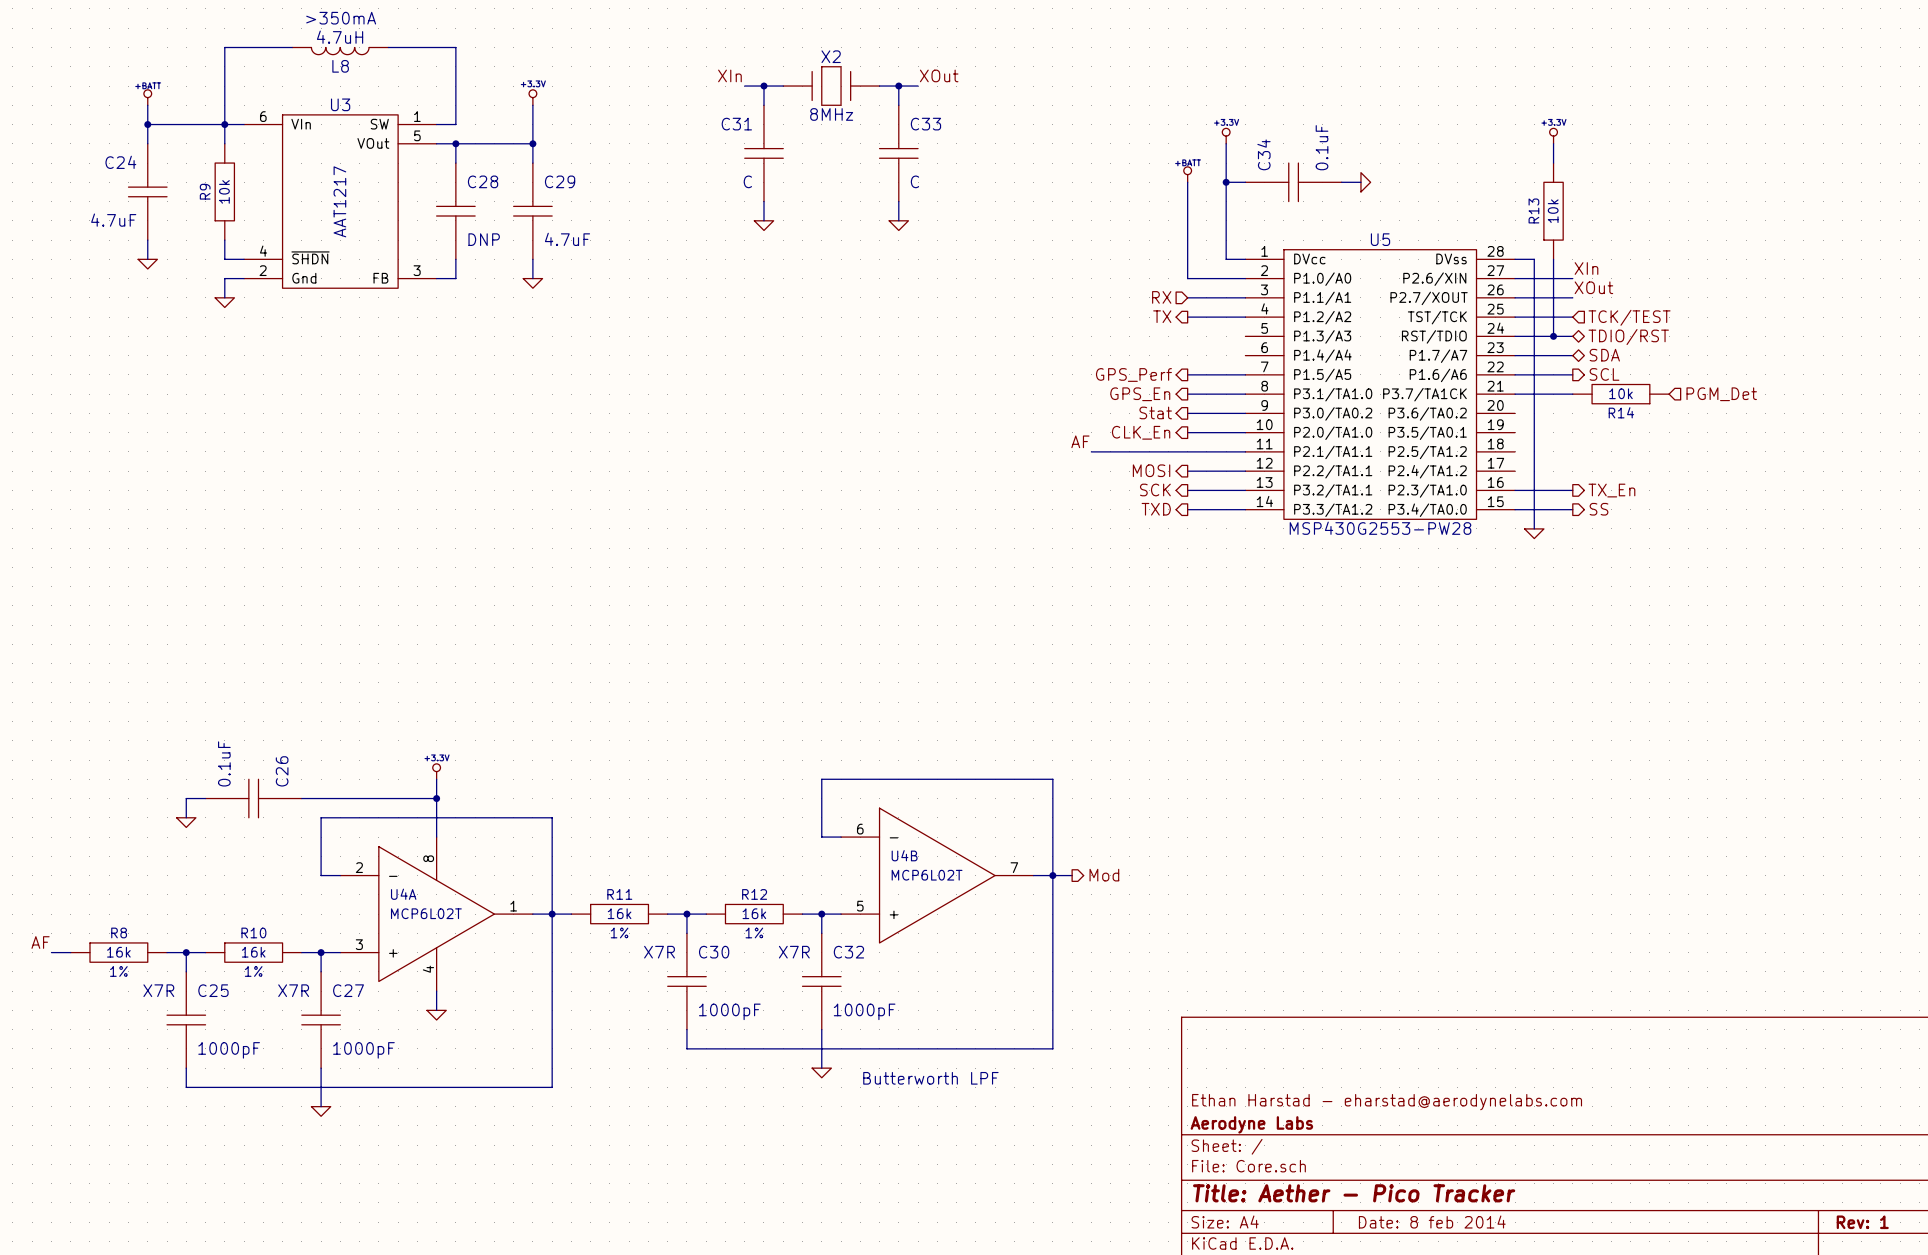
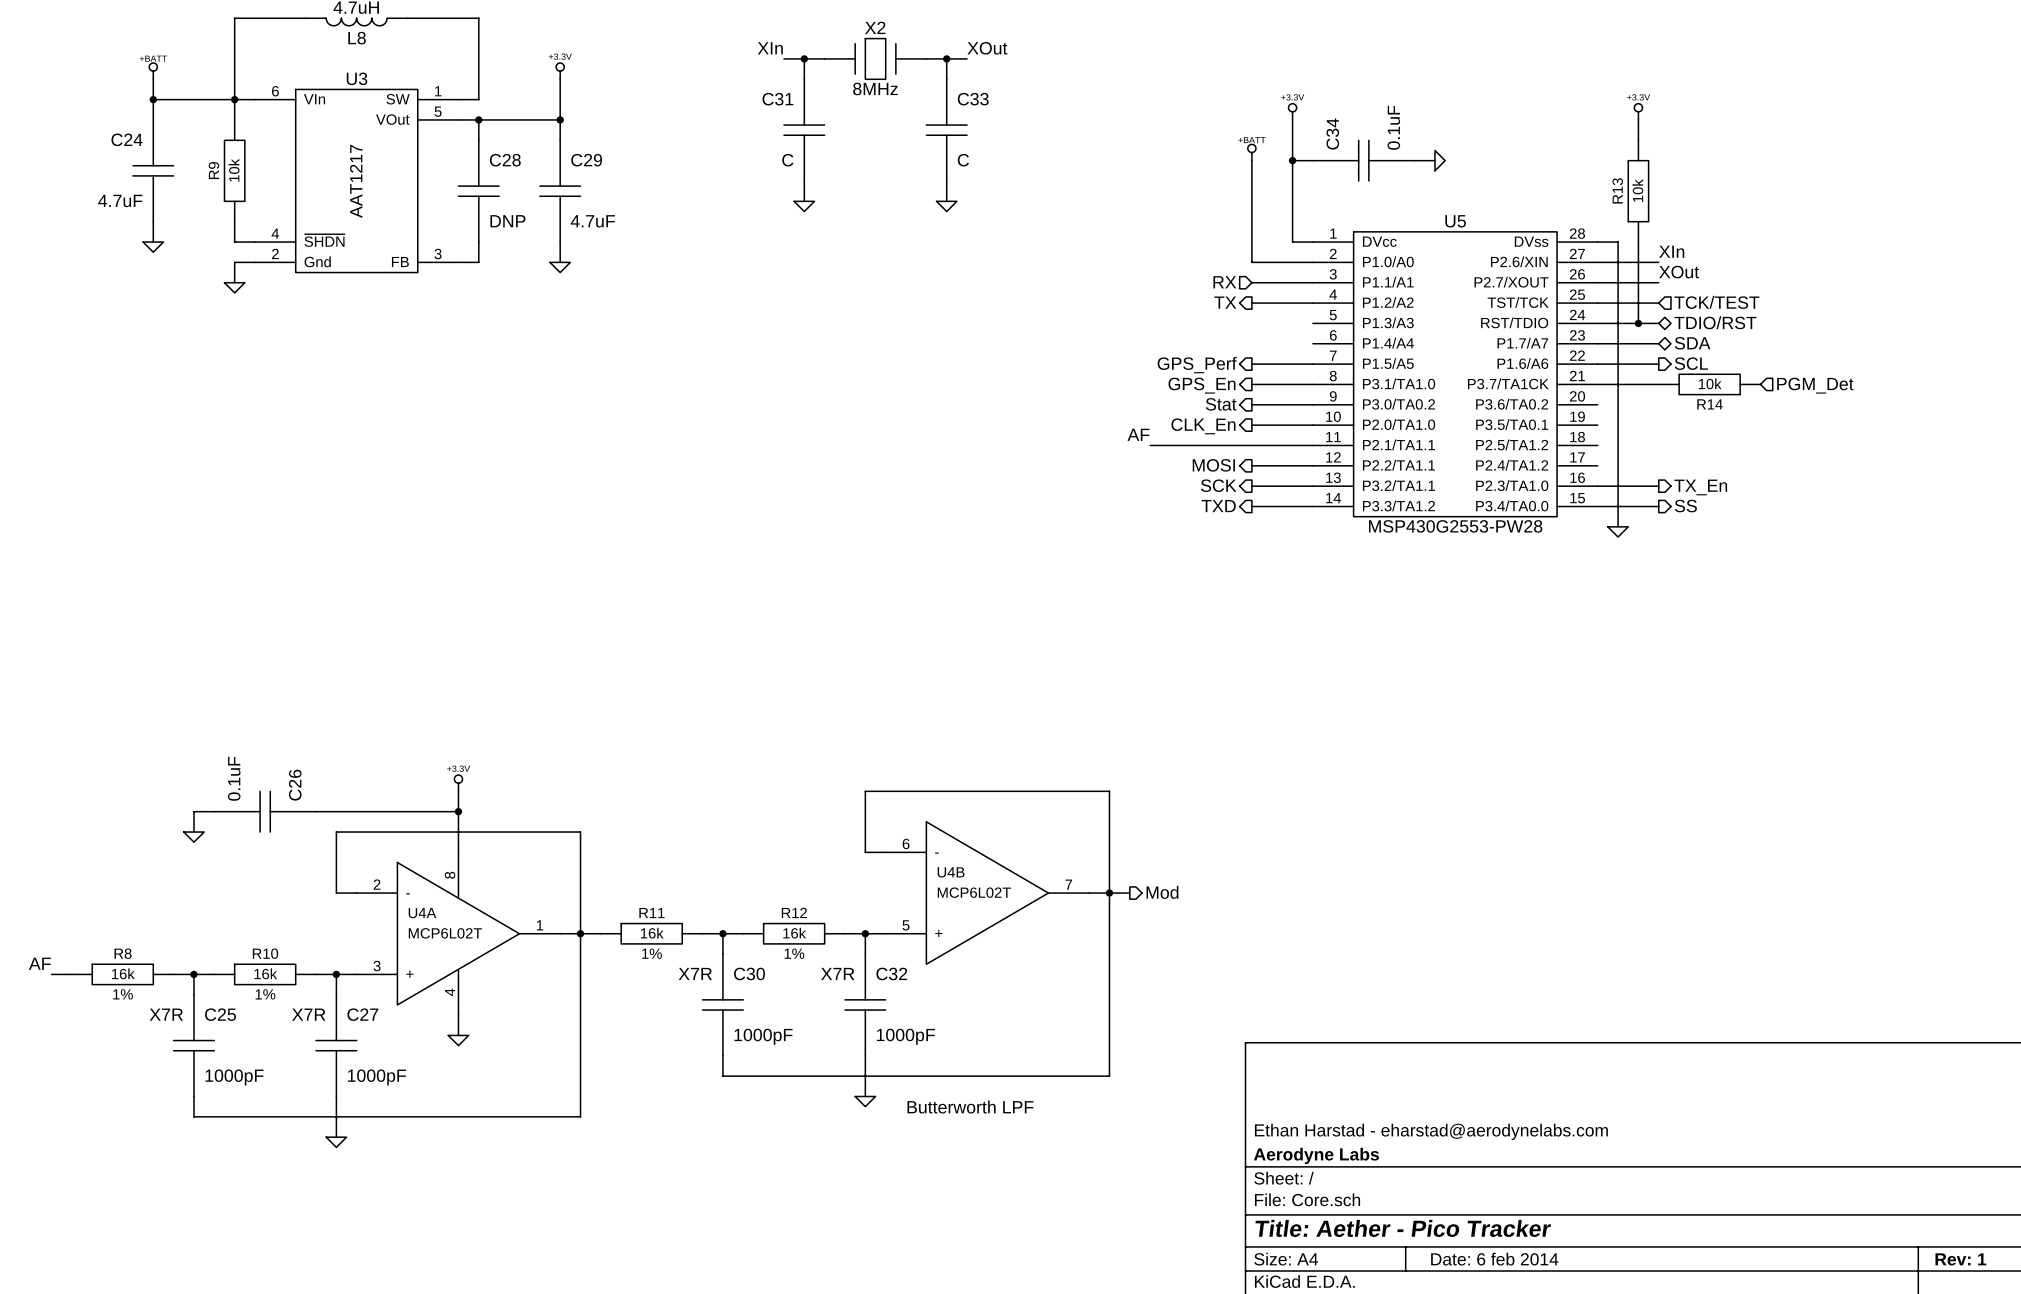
title block: Date: 8 feb 2014 (1432, 1222) -> Date: 6 feb 2014 (1494, 1259)

